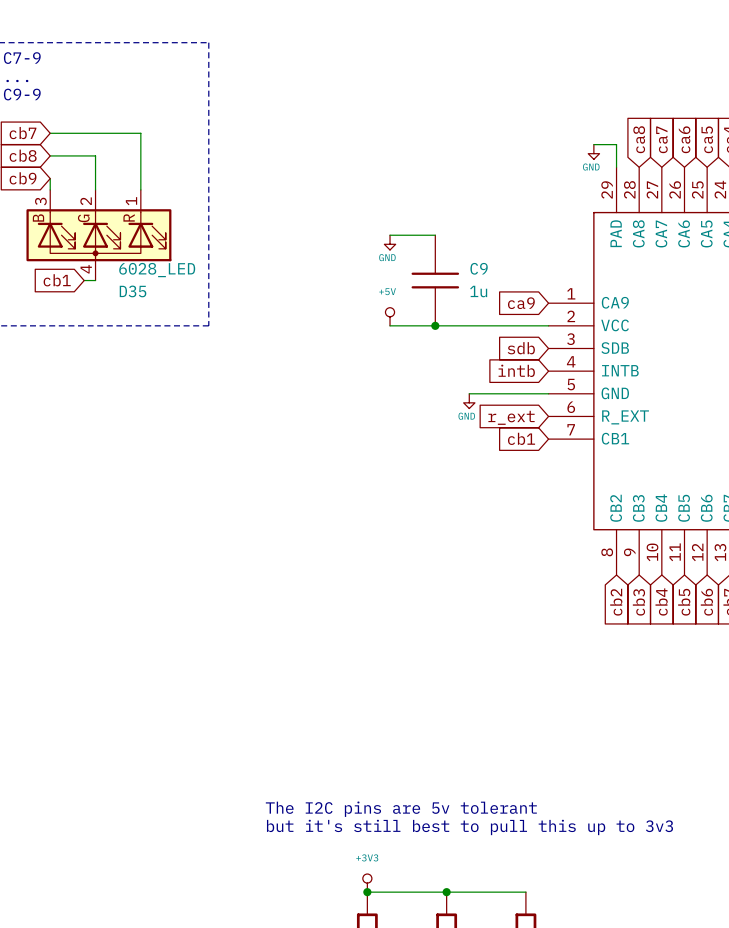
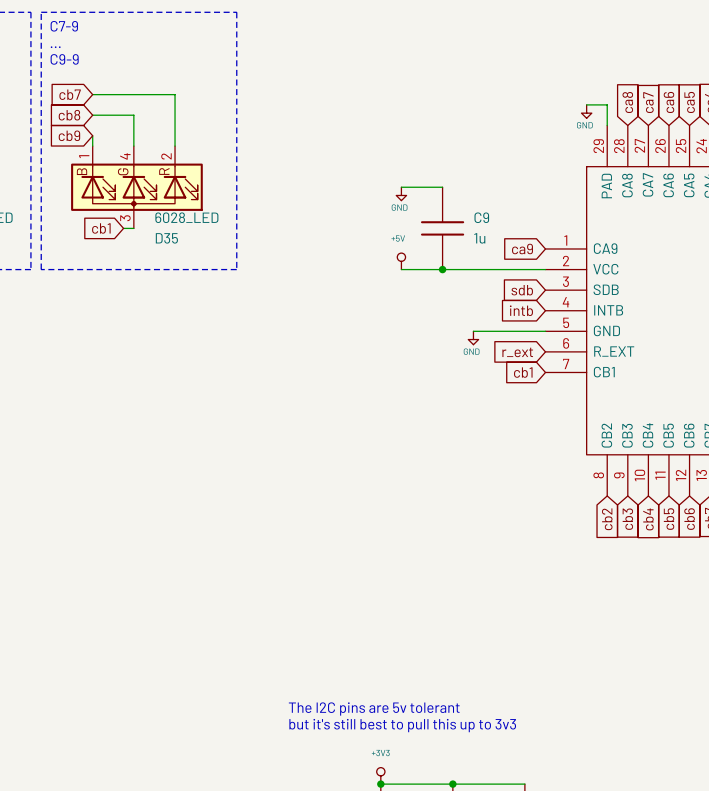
D35 pin number: 3 (40, 201) -> 1 (84, 156)
D35 pin number: 2 (86, 201) -> 4 (125, 156)
D35 pin number: 1 (131, 201) -> 2 (166, 156)
D35 pin number: 4 (86, 269) -> 3 (125, 218)

